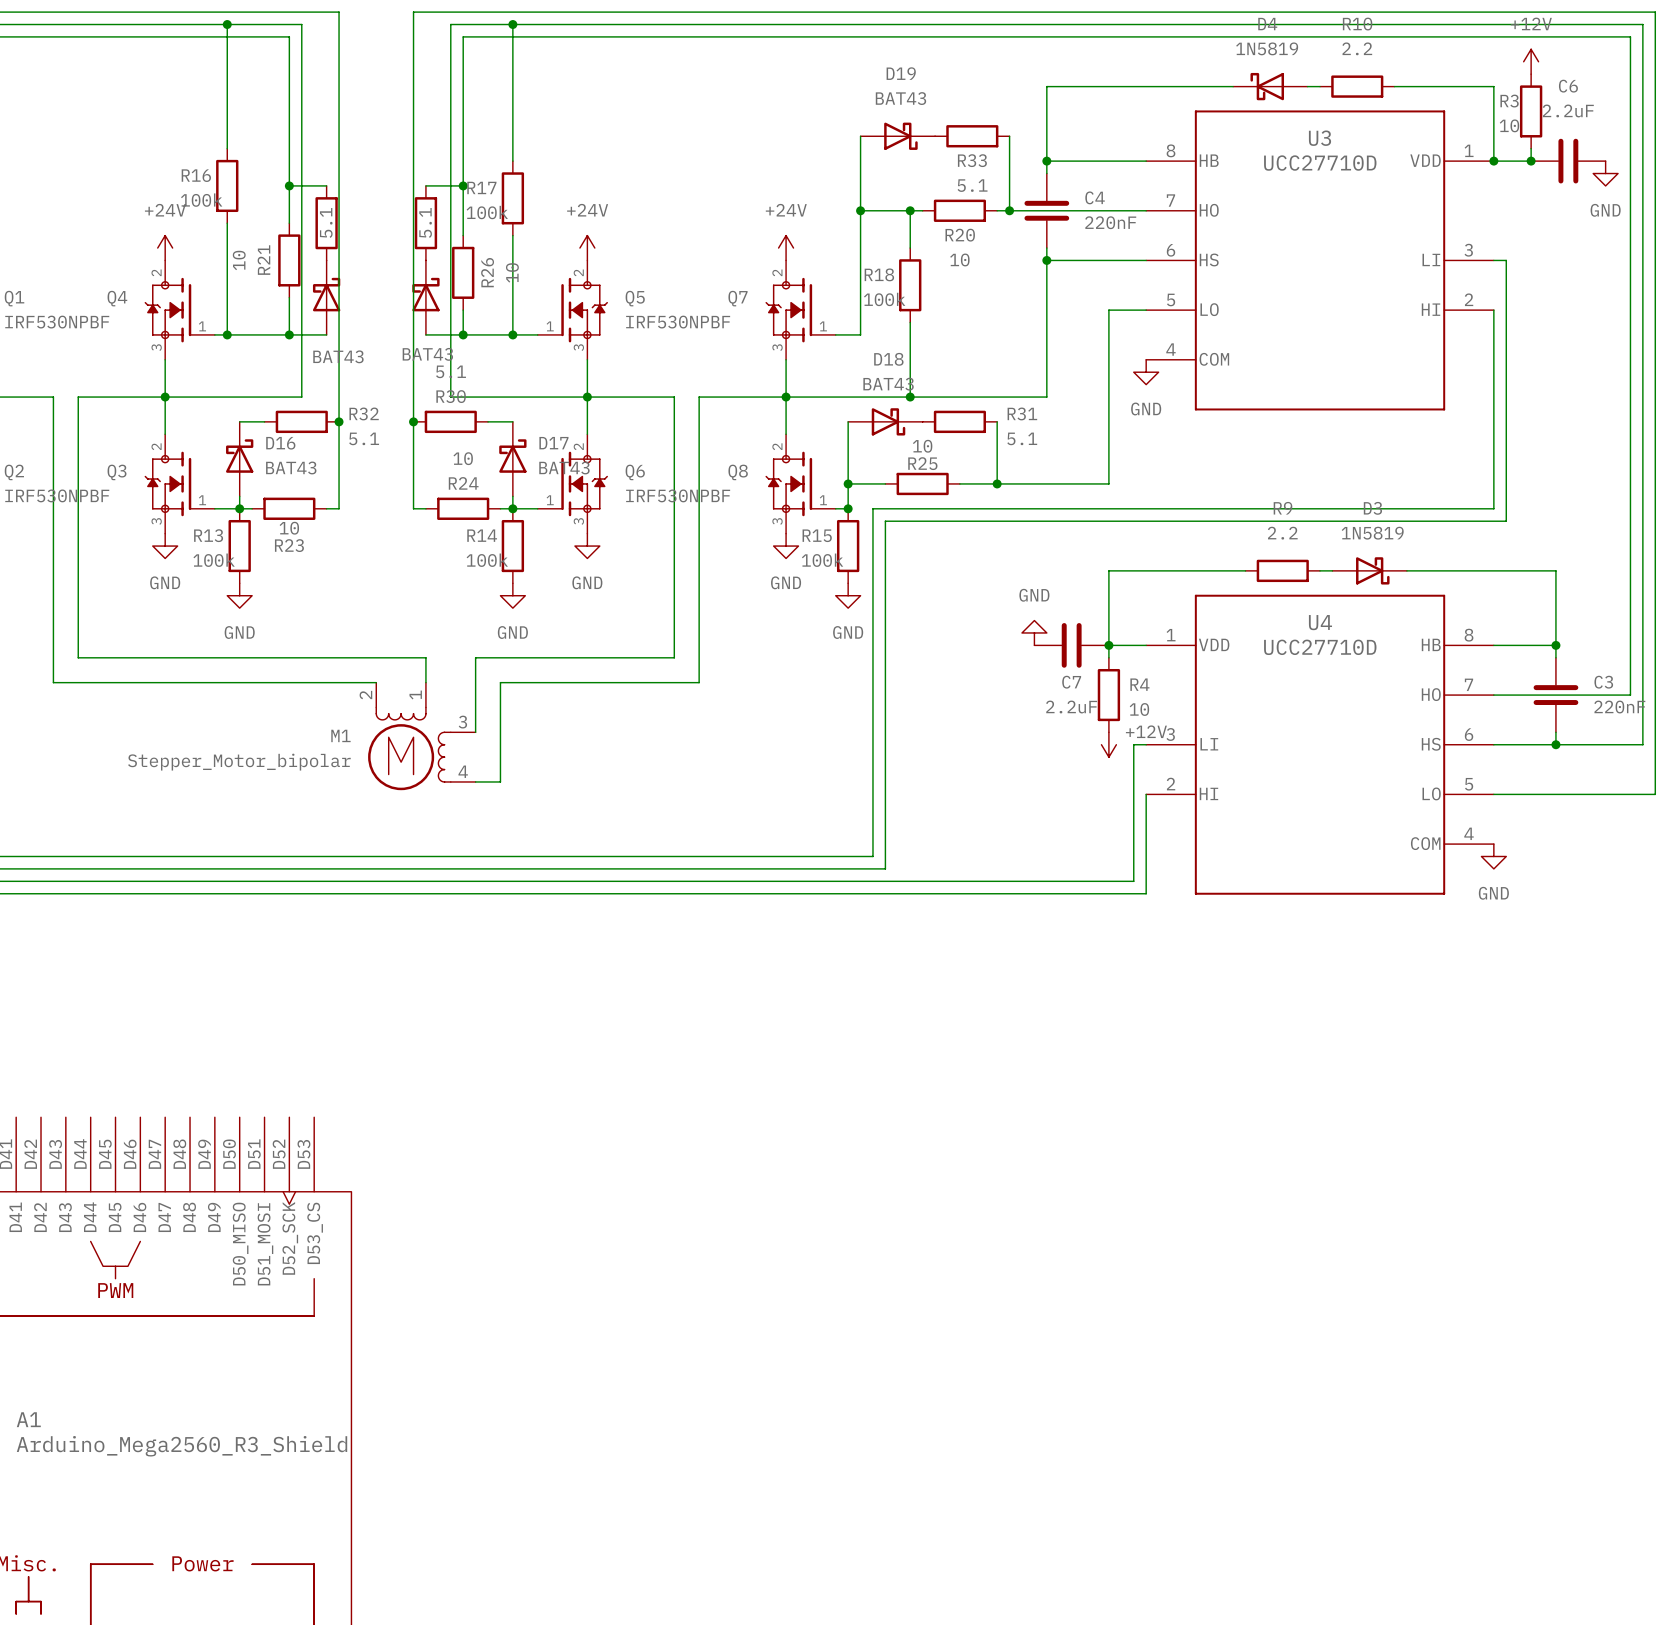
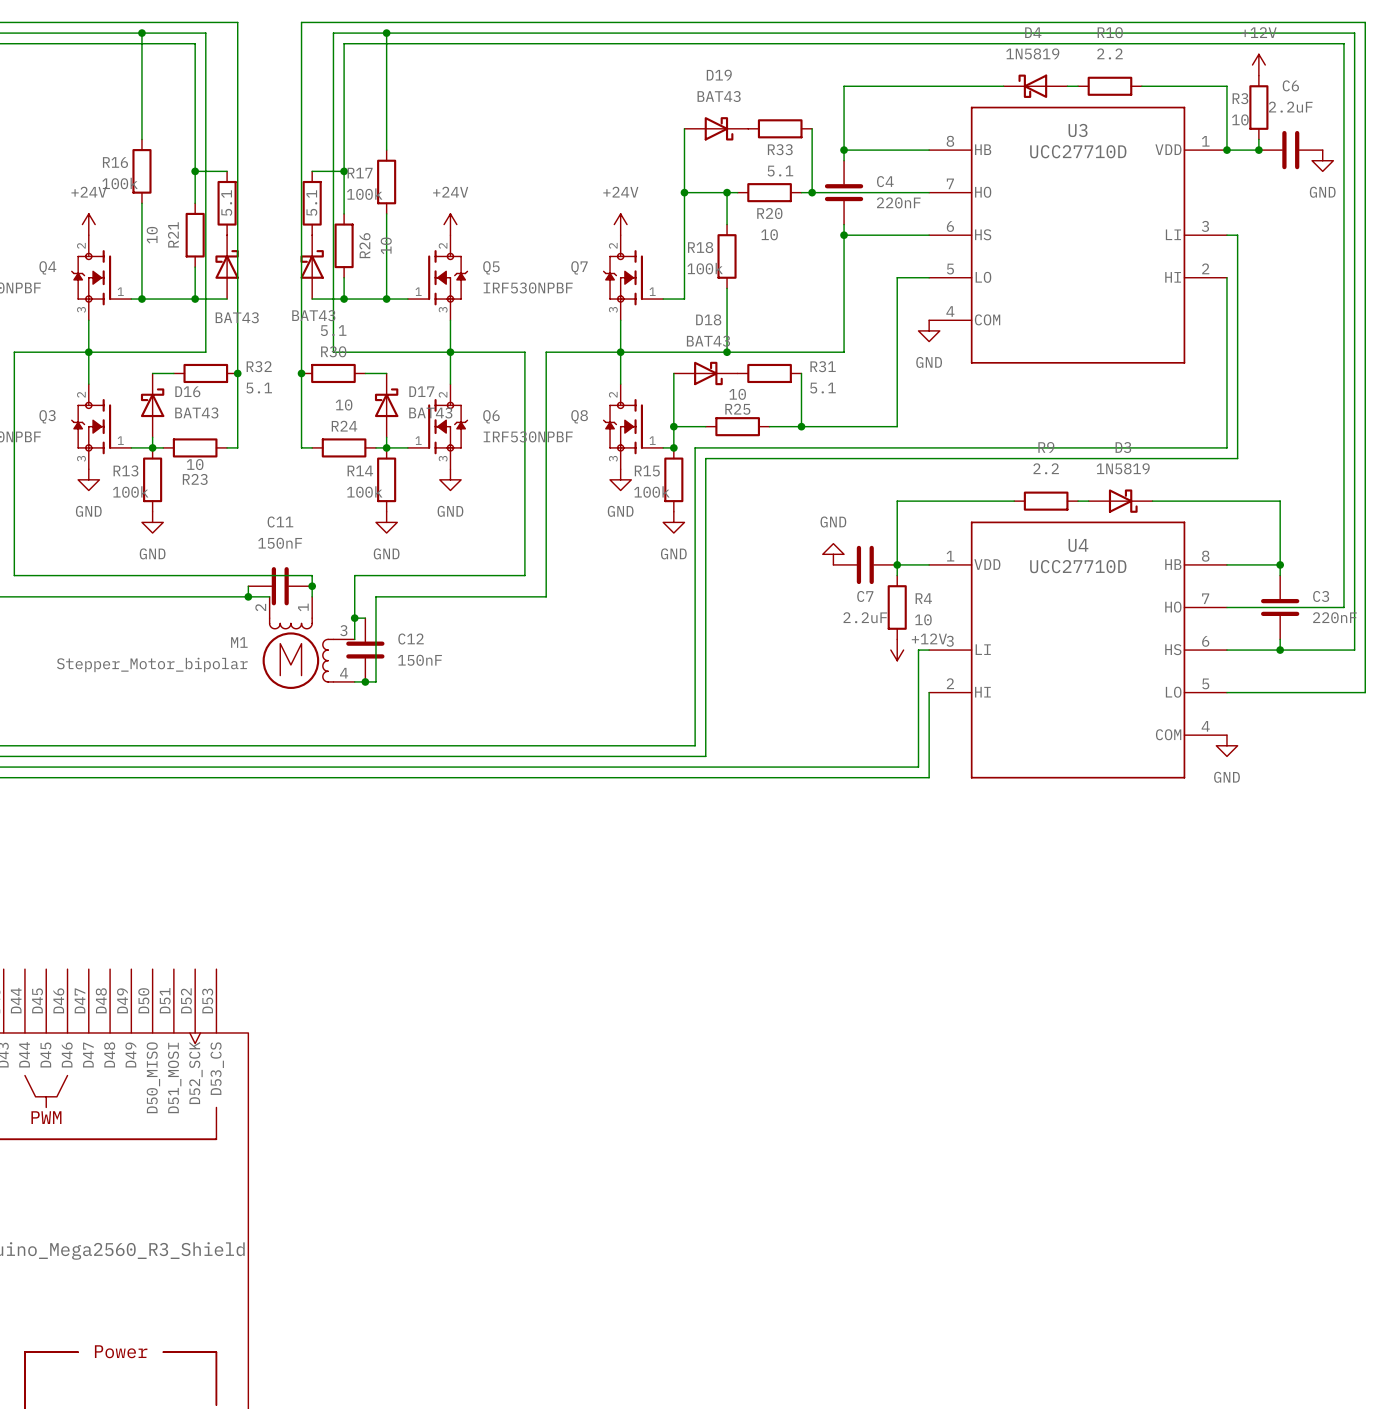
wire: none -> (248, 586) (248, 596)
C11: none -> 150nF (280, 586)
junction: none -> (312, 586)
junction: none -> (248, 596)
wire: none -> (354, 618) (365, 618)
junction: none -> (354, 618)
C12: none -> 150nF (365, 650)
junction: none -> (365, 681)

